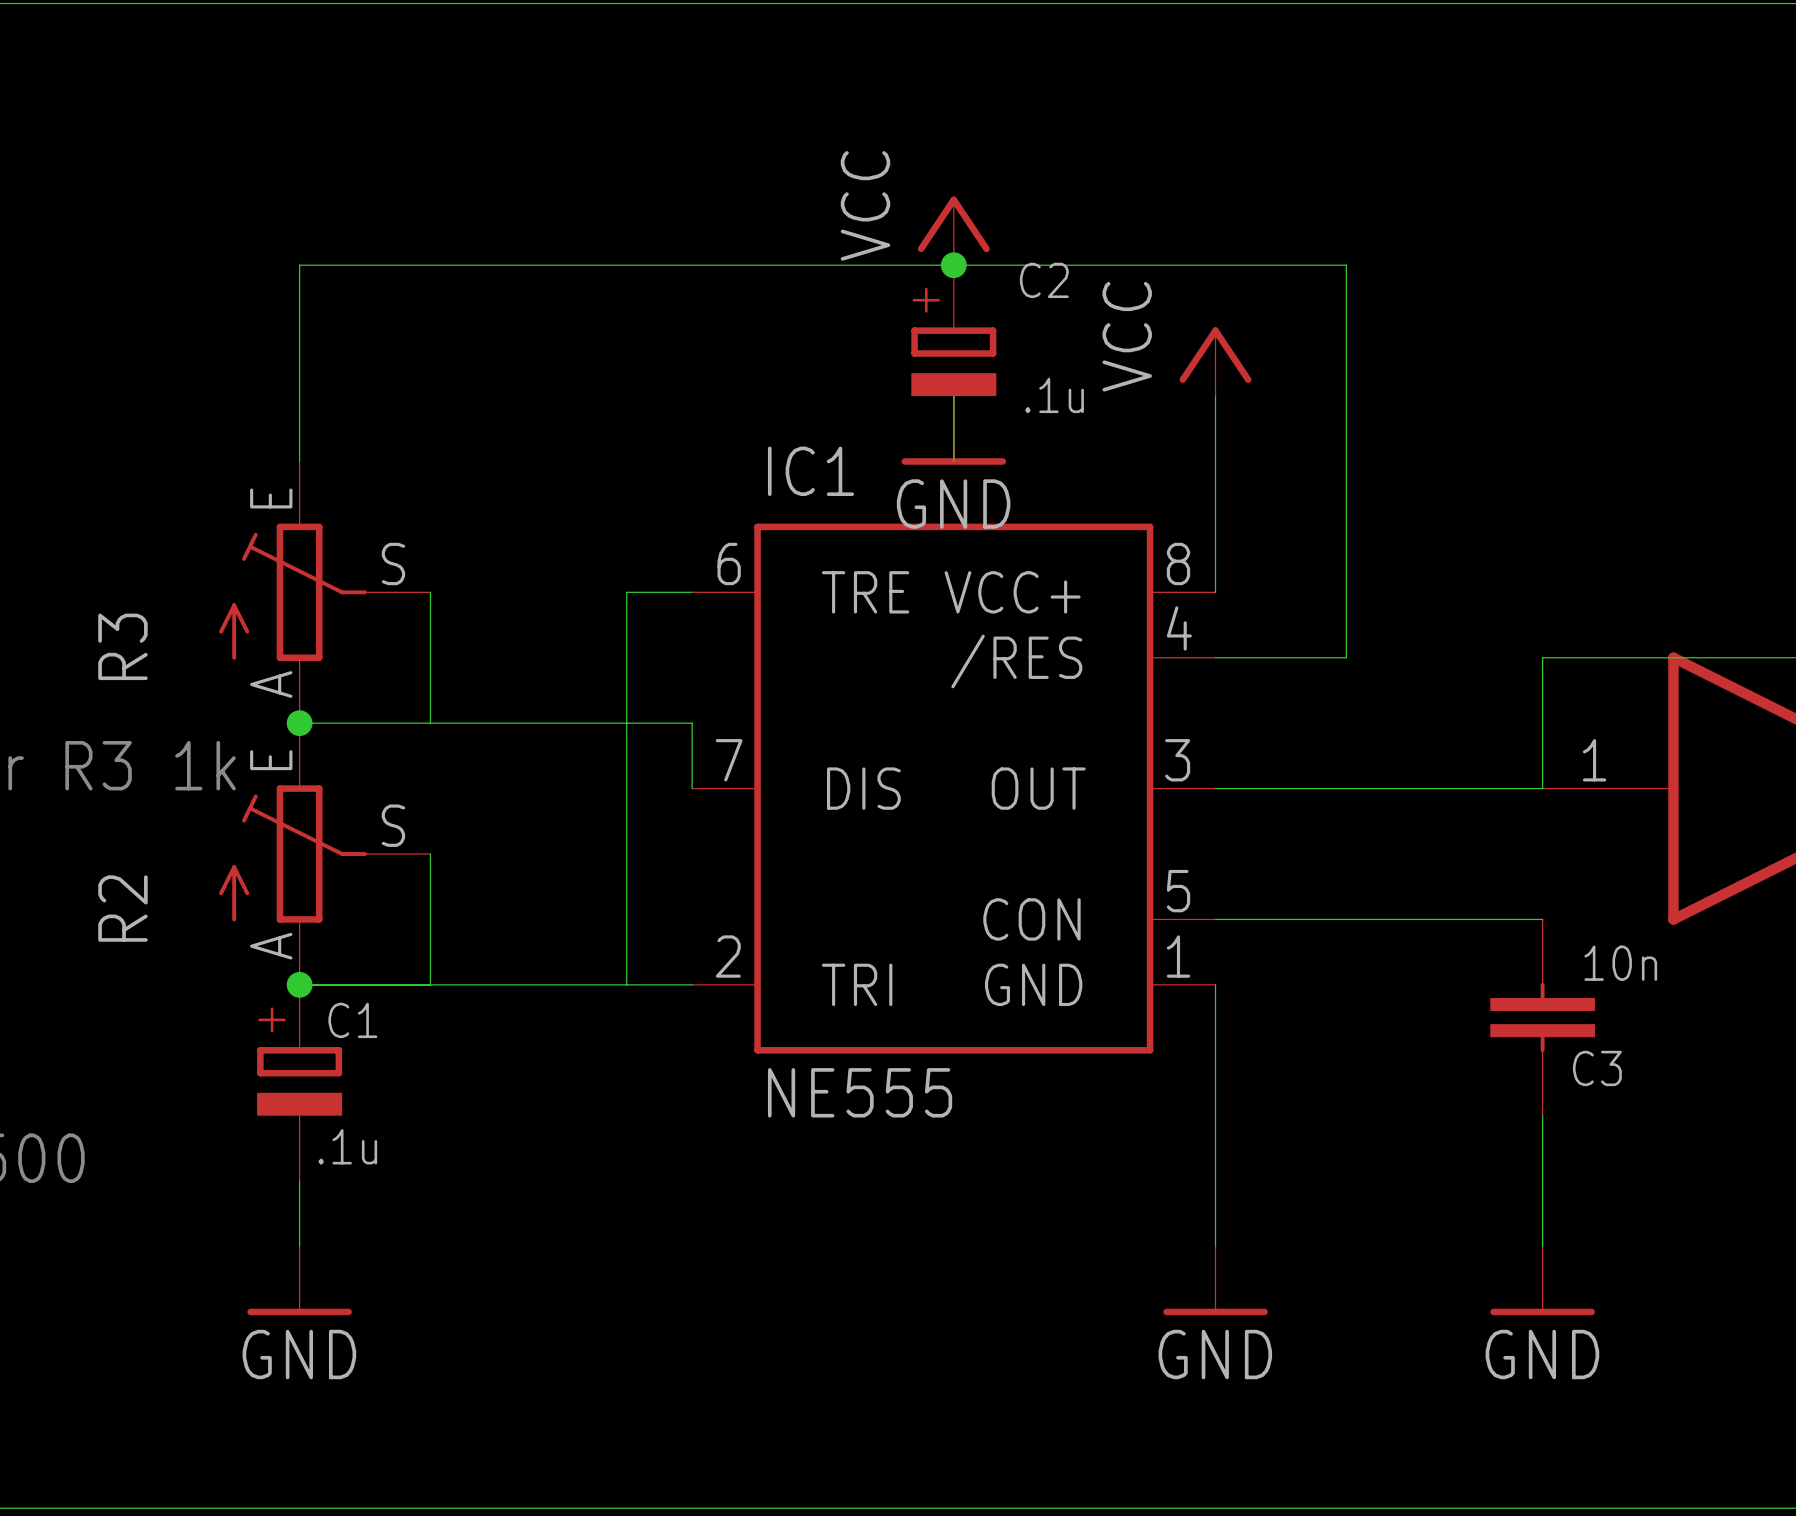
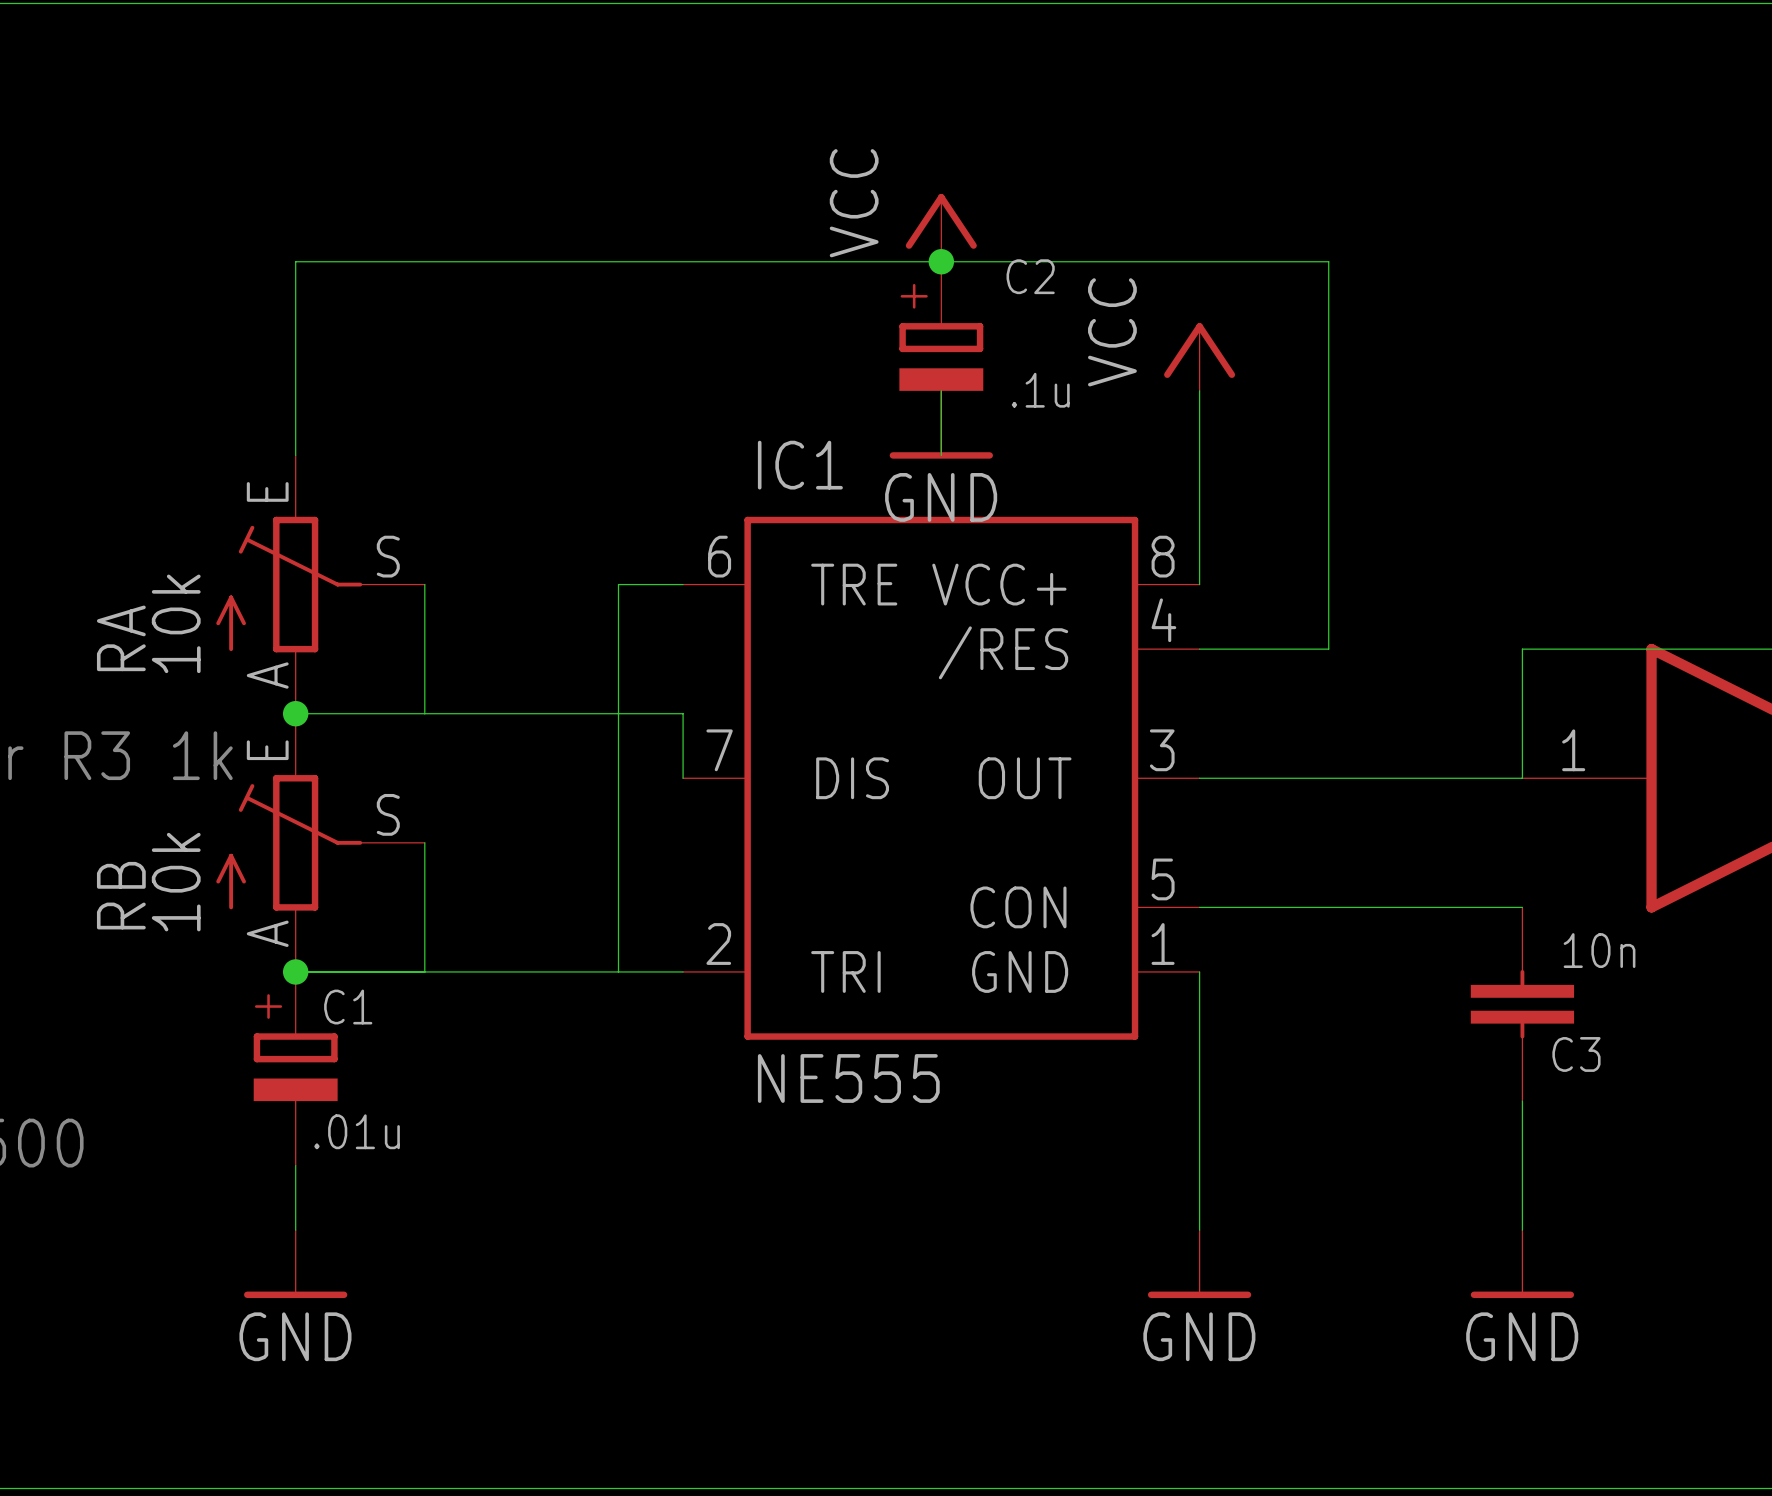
R3 value: none -> 10k (176, 623)
R3 name: R3 (122, 646) -> RA (121, 638)
R2 value: none -> 10k (176, 882)
R2 name: R2 (122, 908) -> RB (121, 895)
C1 value: .1u (347, 1146) -> .01u (357, 1131)

